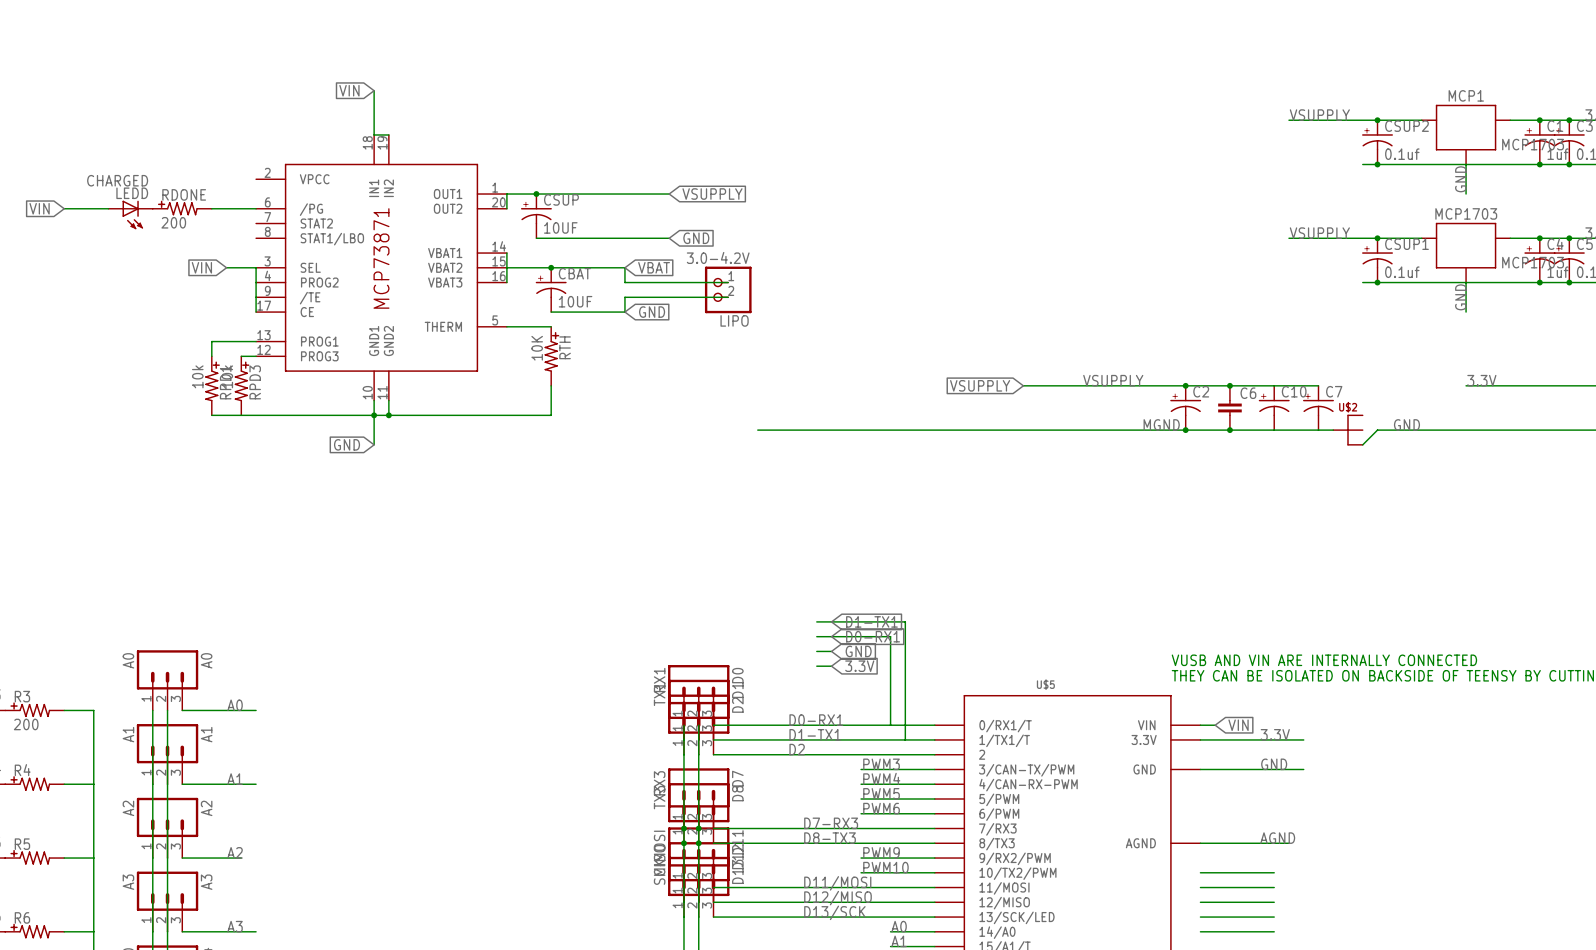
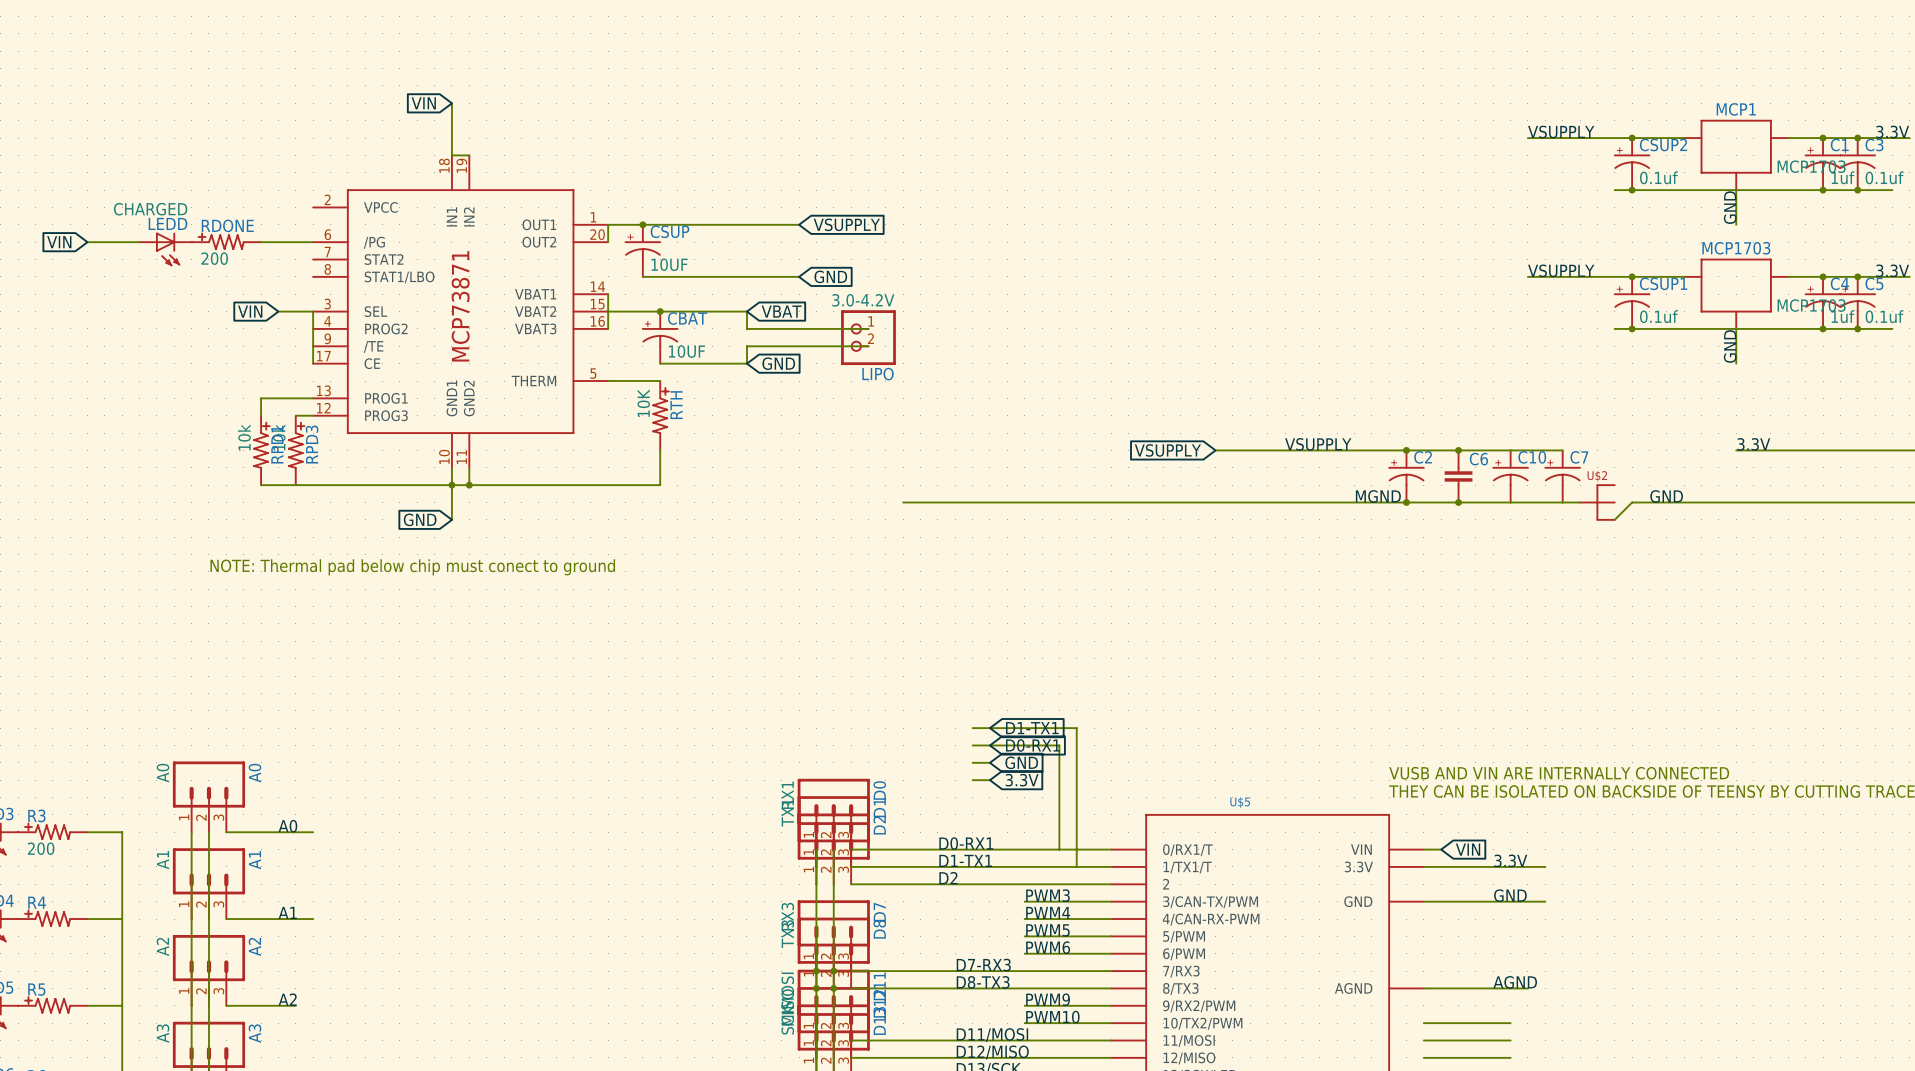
text: none -> NOTE: Thermal pad below chip must conect to ground (412, 567)

